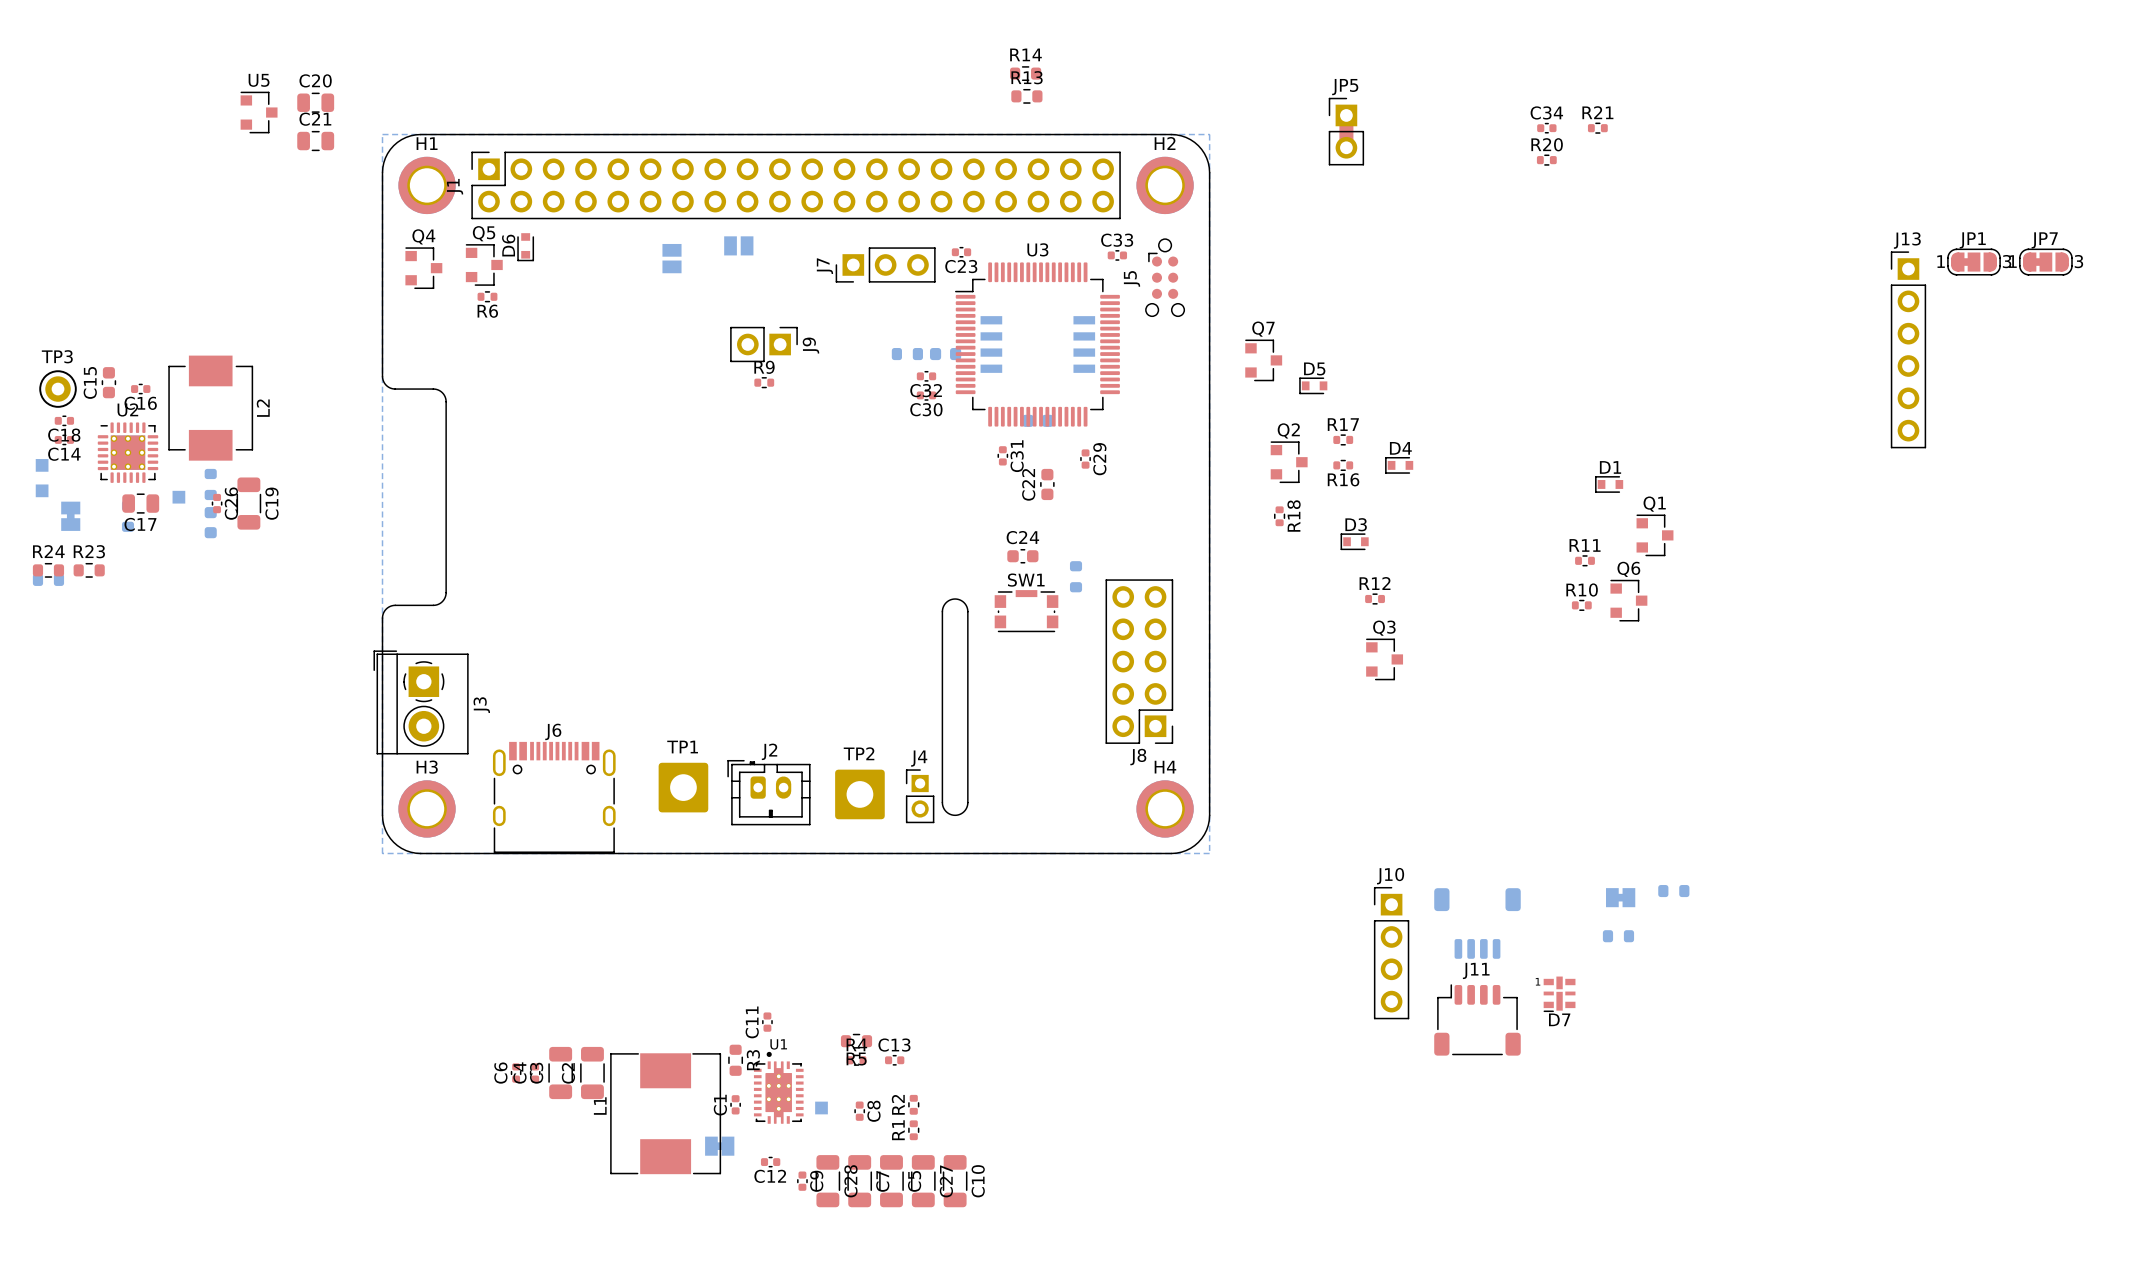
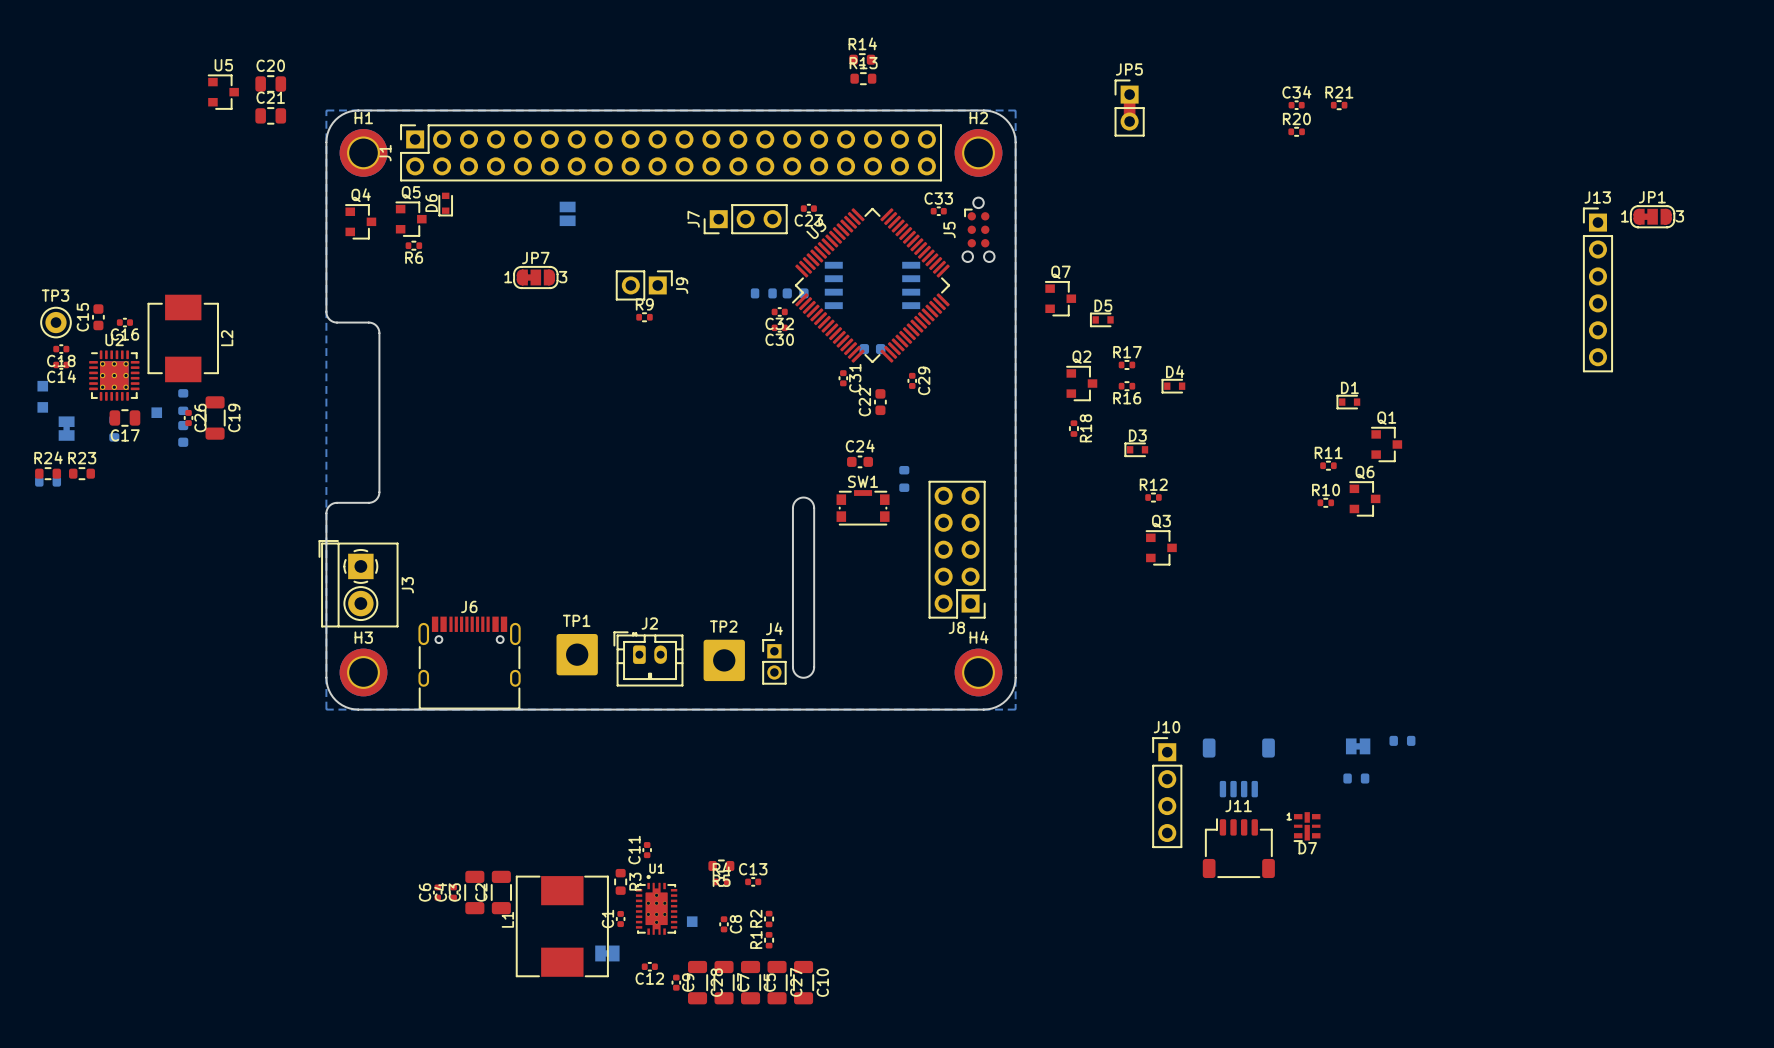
part: (738, 245) -> none
JP7 position: (2045, 262) -> (535, 277)
U3 rotation: 0° (1037, 344) -> 45° counterclockwise (871, 285)

